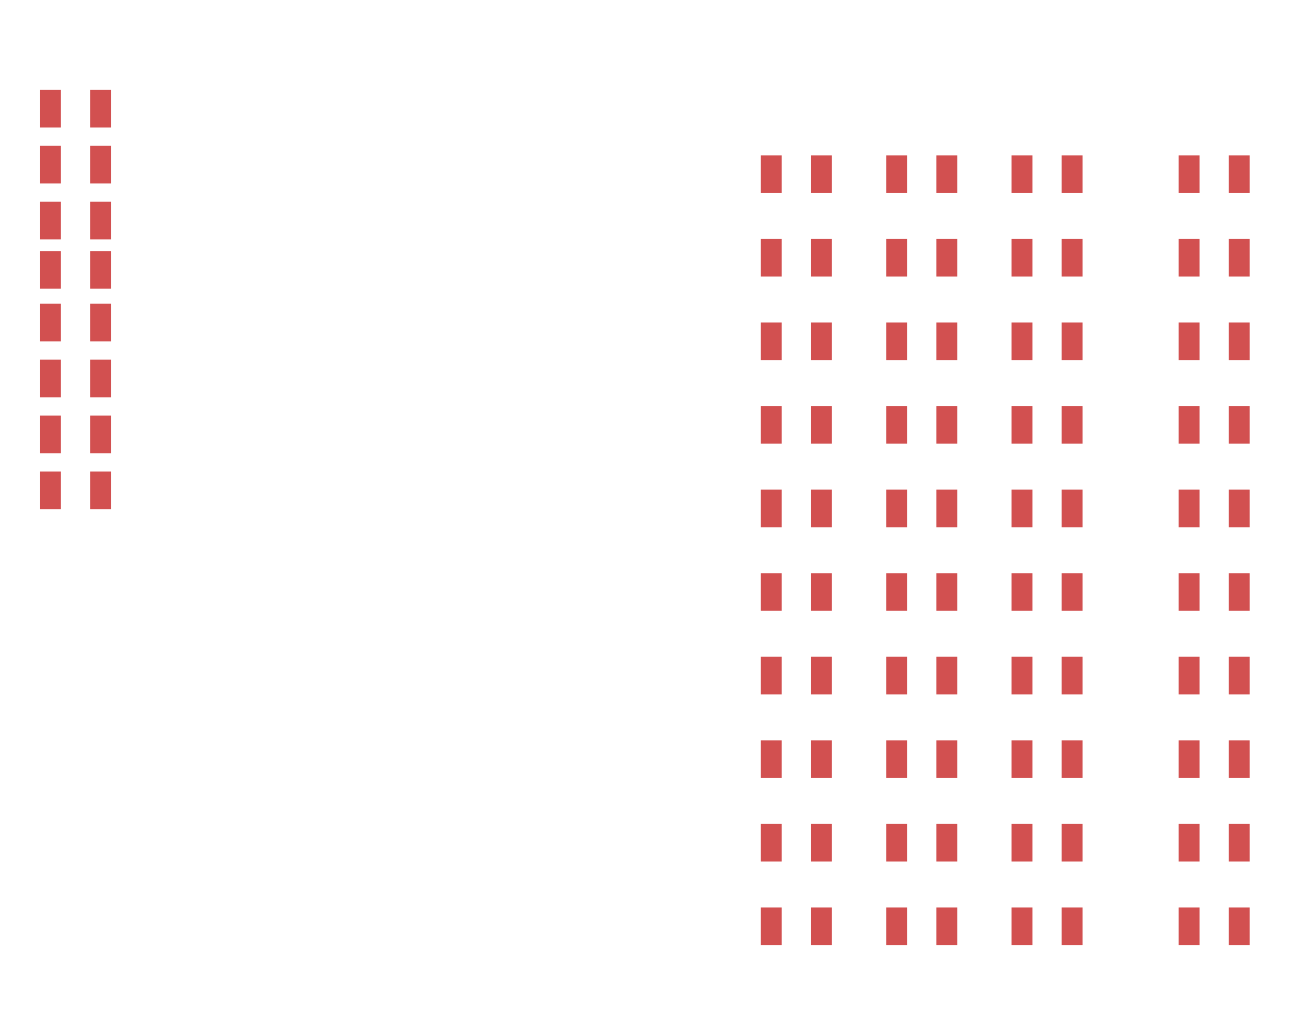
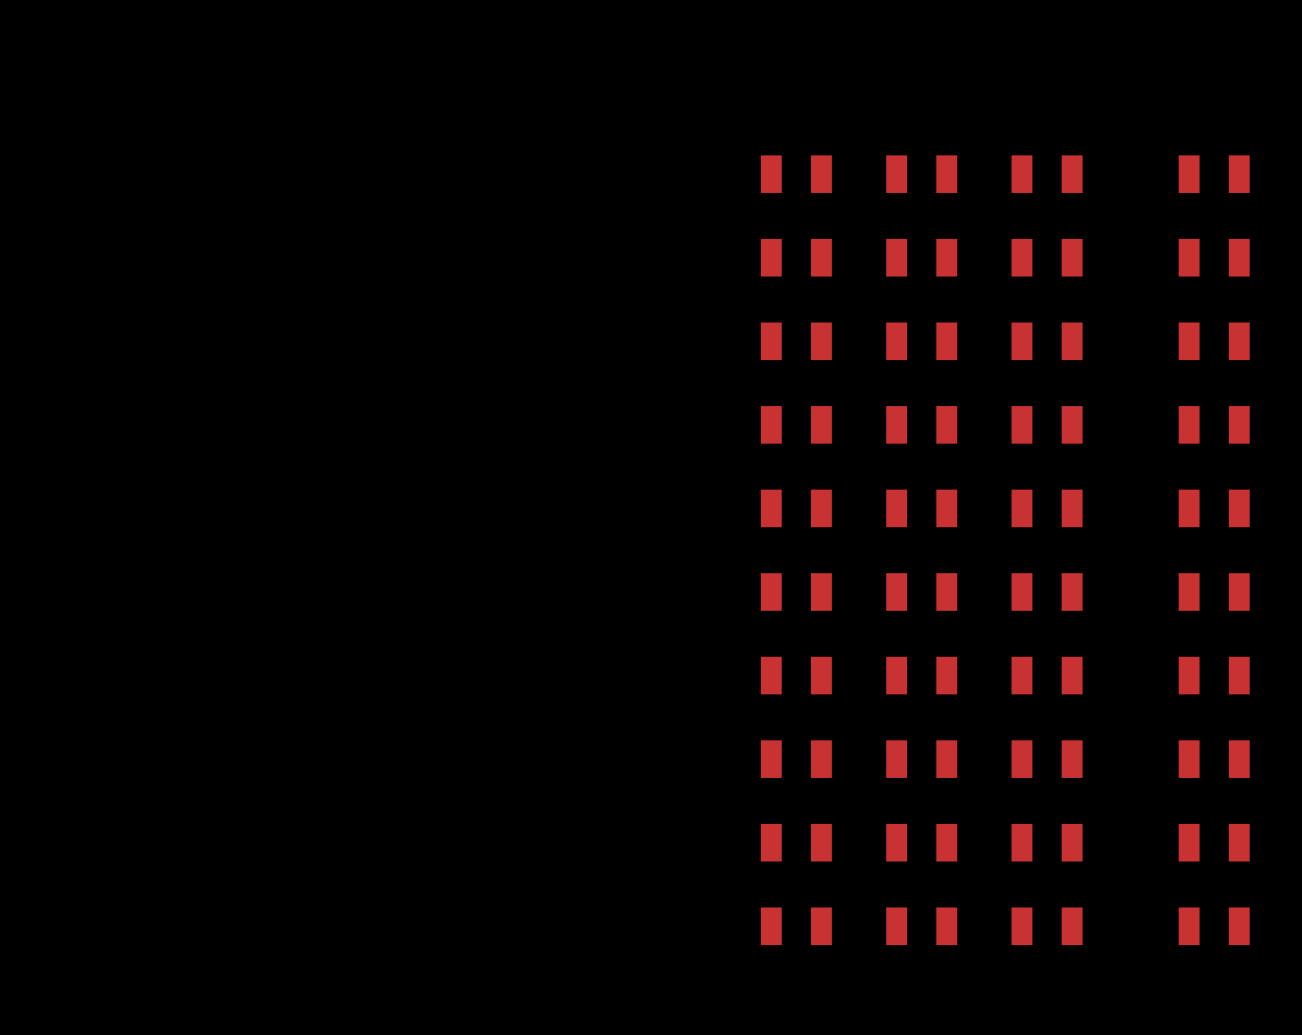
part: (75, 108) -> none
part: (75, 164) -> none
part: (75, 220) -> none
part: (75, 269) -> none
part: (75, 322) -> none
part: (75, 378) -> none
part: (75, 434) -> none
part: (75, 490) -> none

